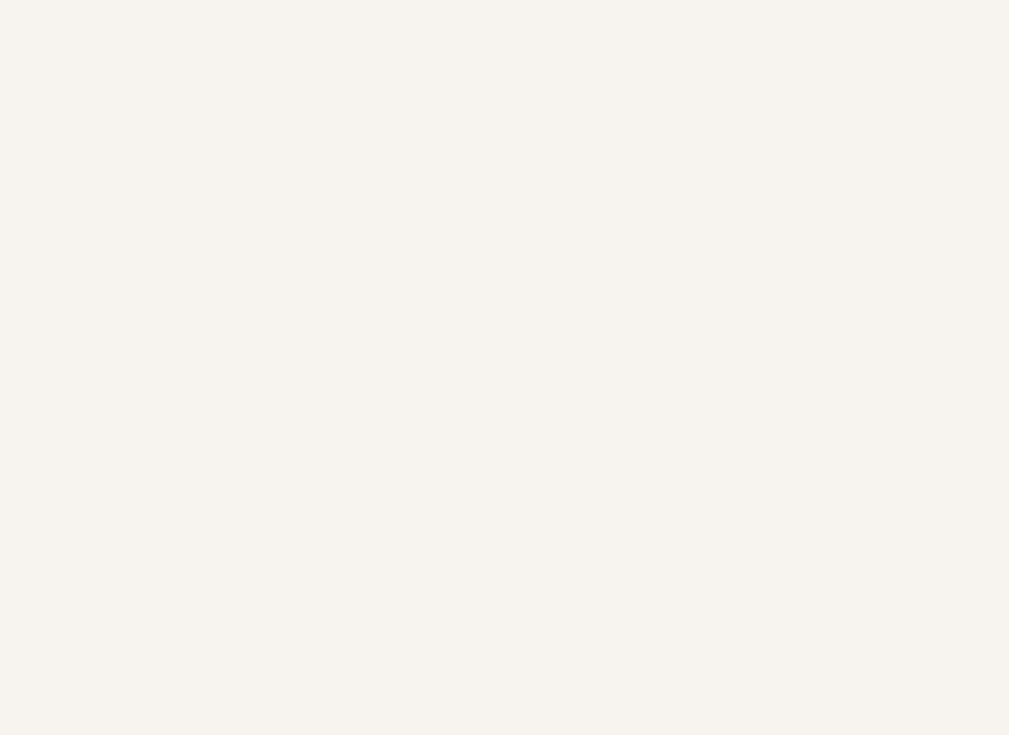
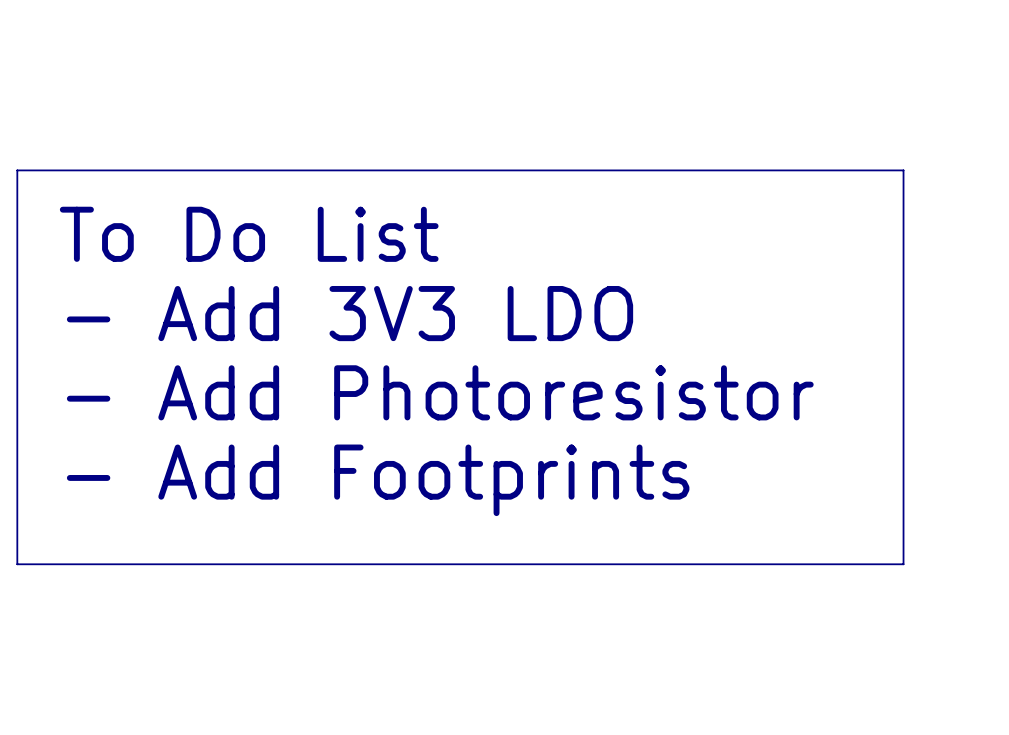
line: none -> (17, 170) (903, 170) (903, 564) (17, 564) (17, 170)
text: none -> To Do List (249, 234)
text: none -> - Add 3V3 LDO (350, 313)
text: none -> - Add Photoresistor (440, 392)
text: none -> - Add Footprints (378, 480)

